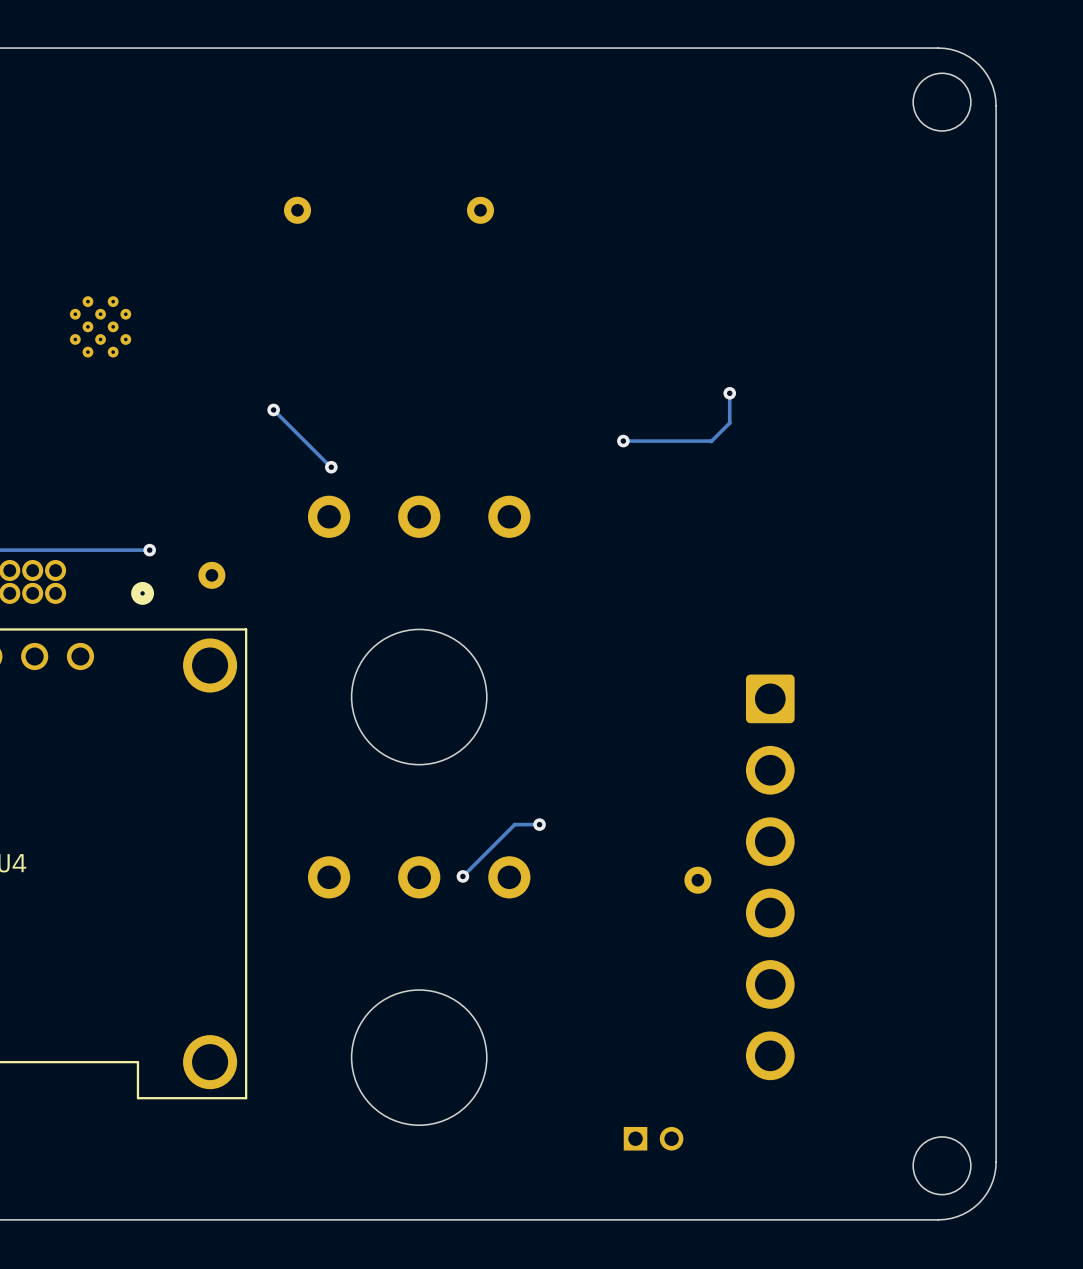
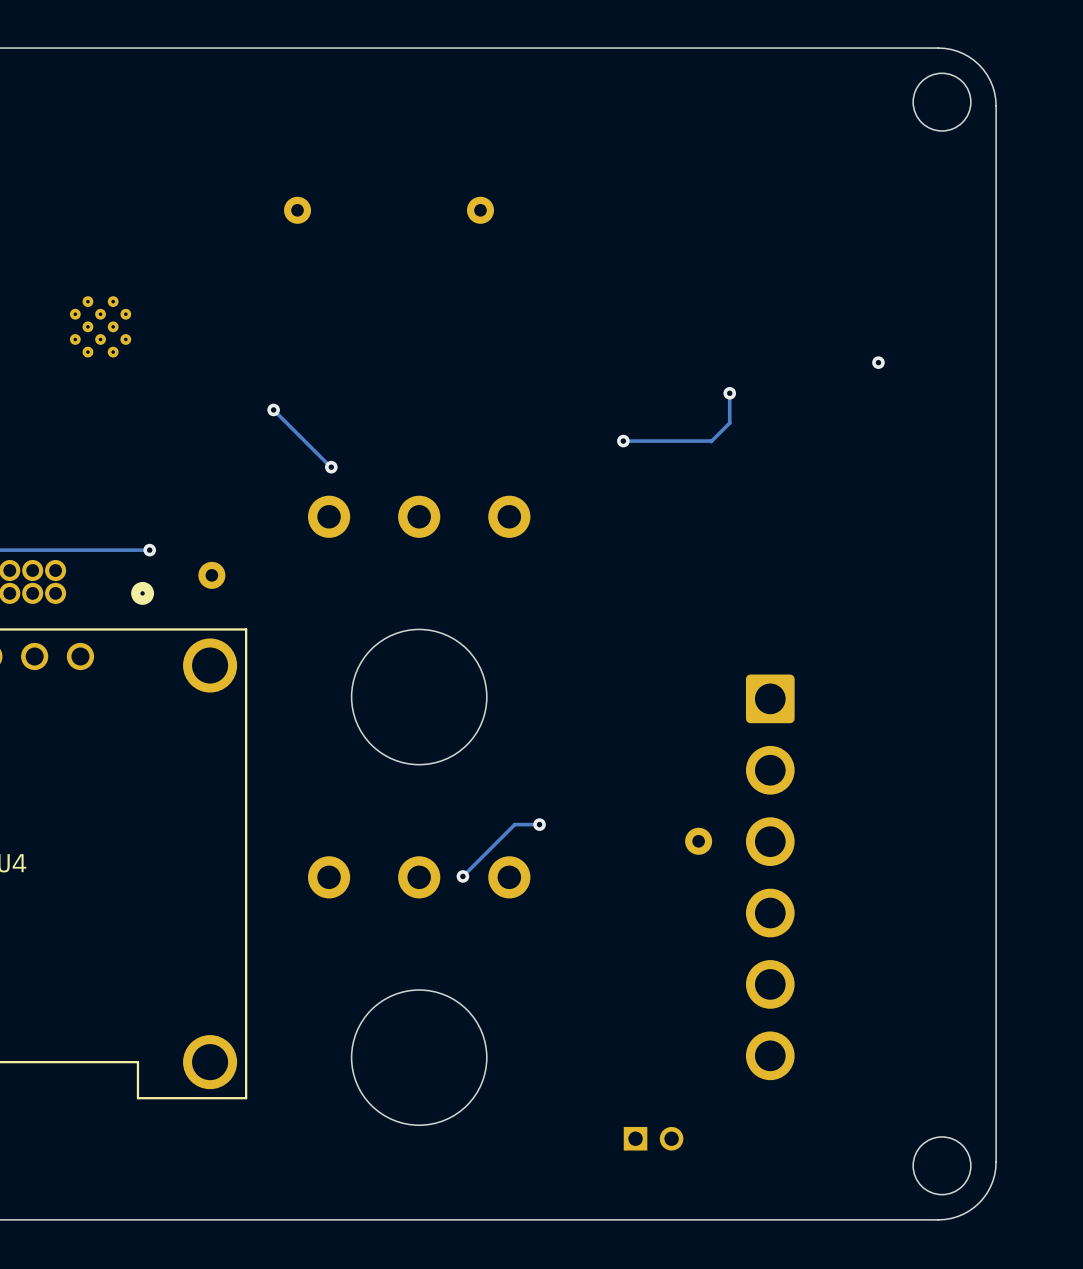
via: none -> (878, 362)
part position: (697, 880) -> (698, 841)

